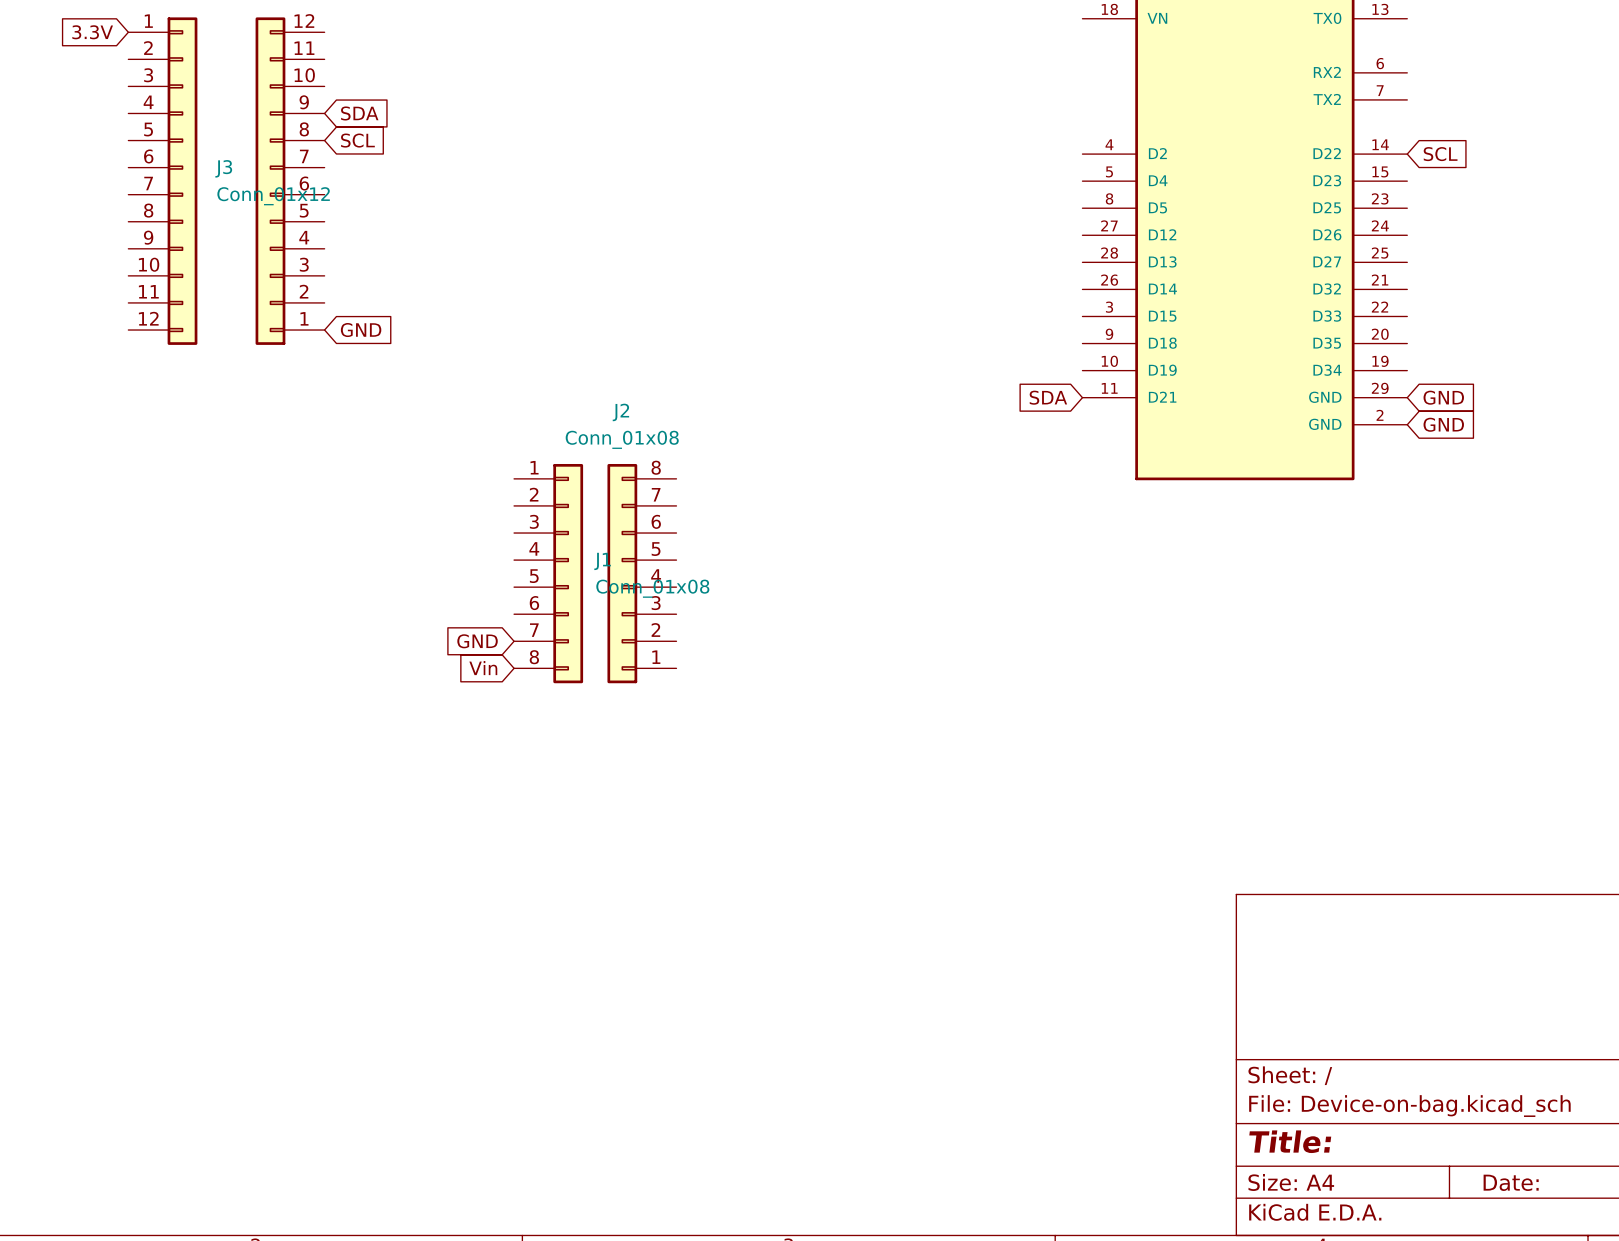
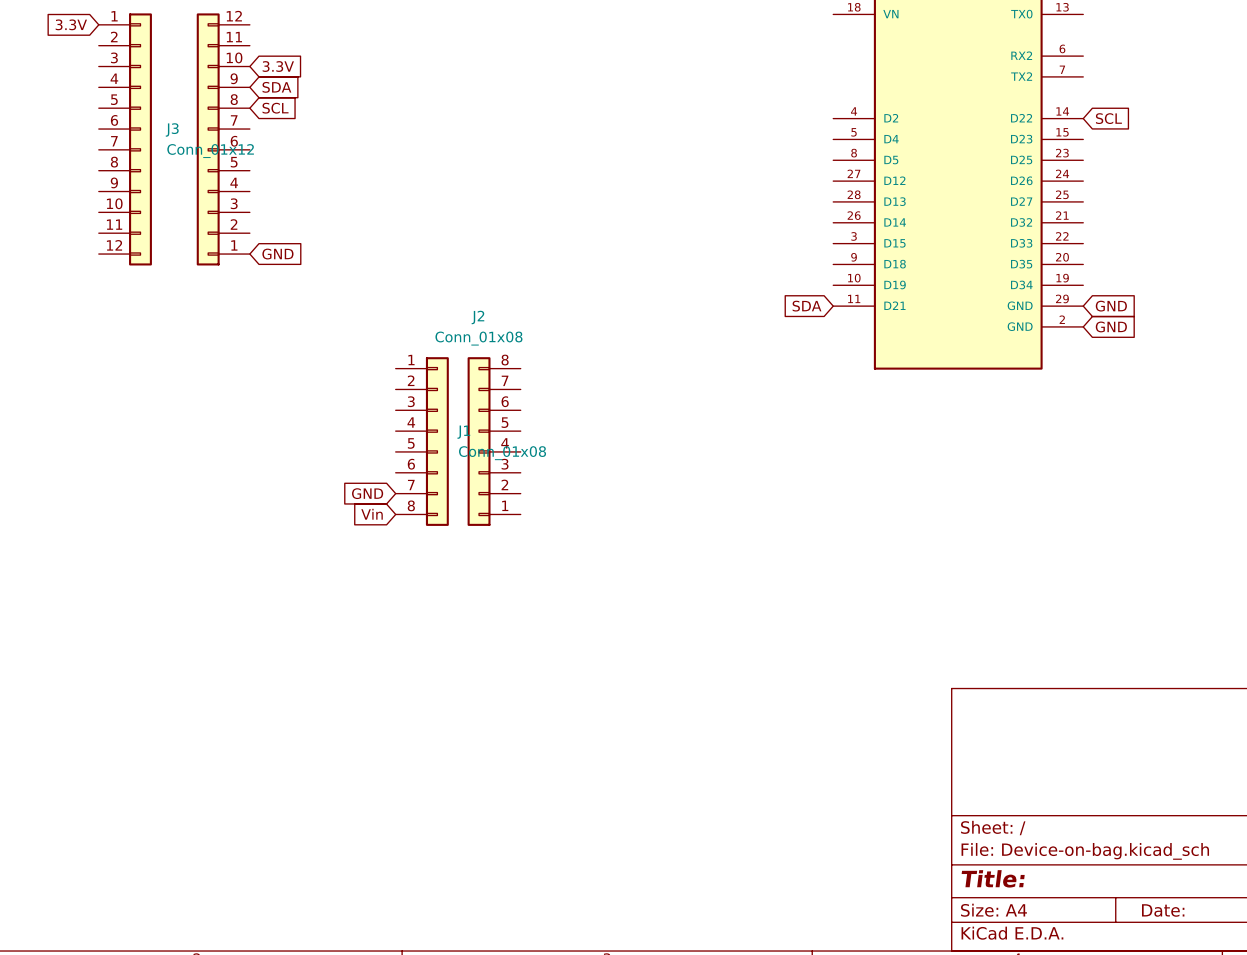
global label: none -> 3.3V (278, 66)

